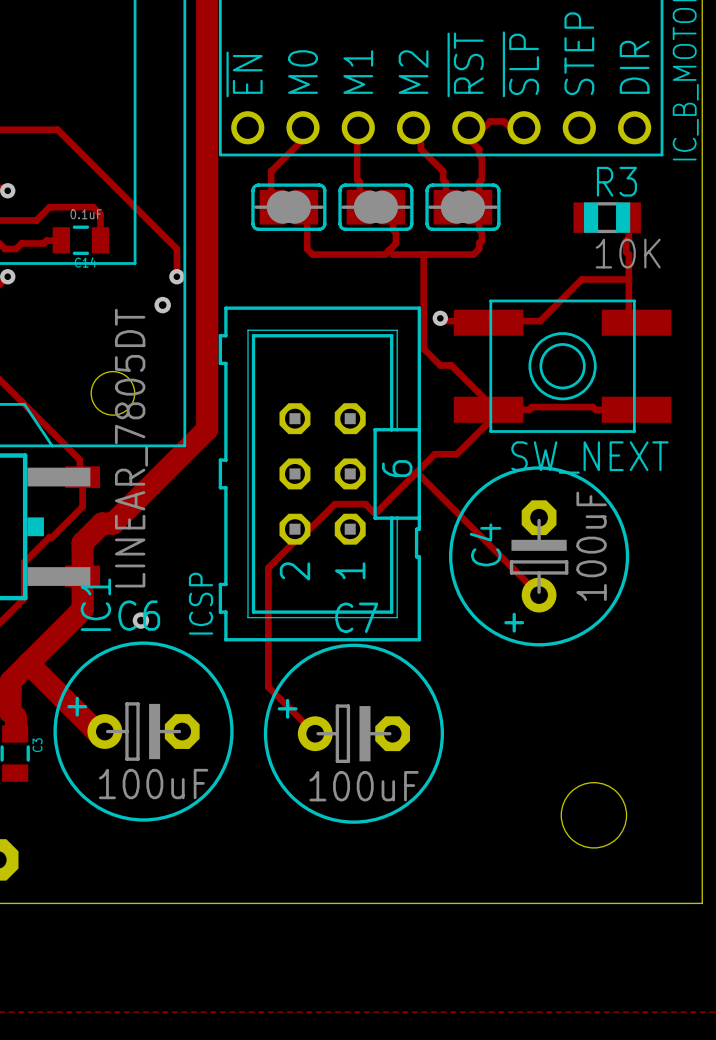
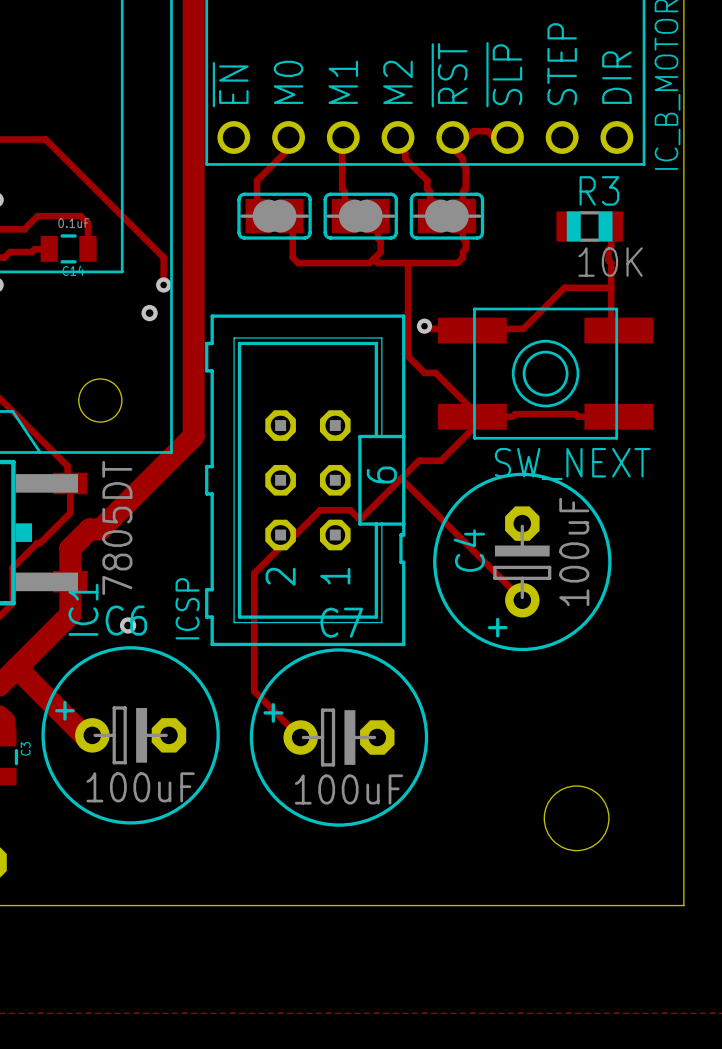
IC1 value: LINEAR_7805DT (131, 448) -> 7805DT (117, 528)

